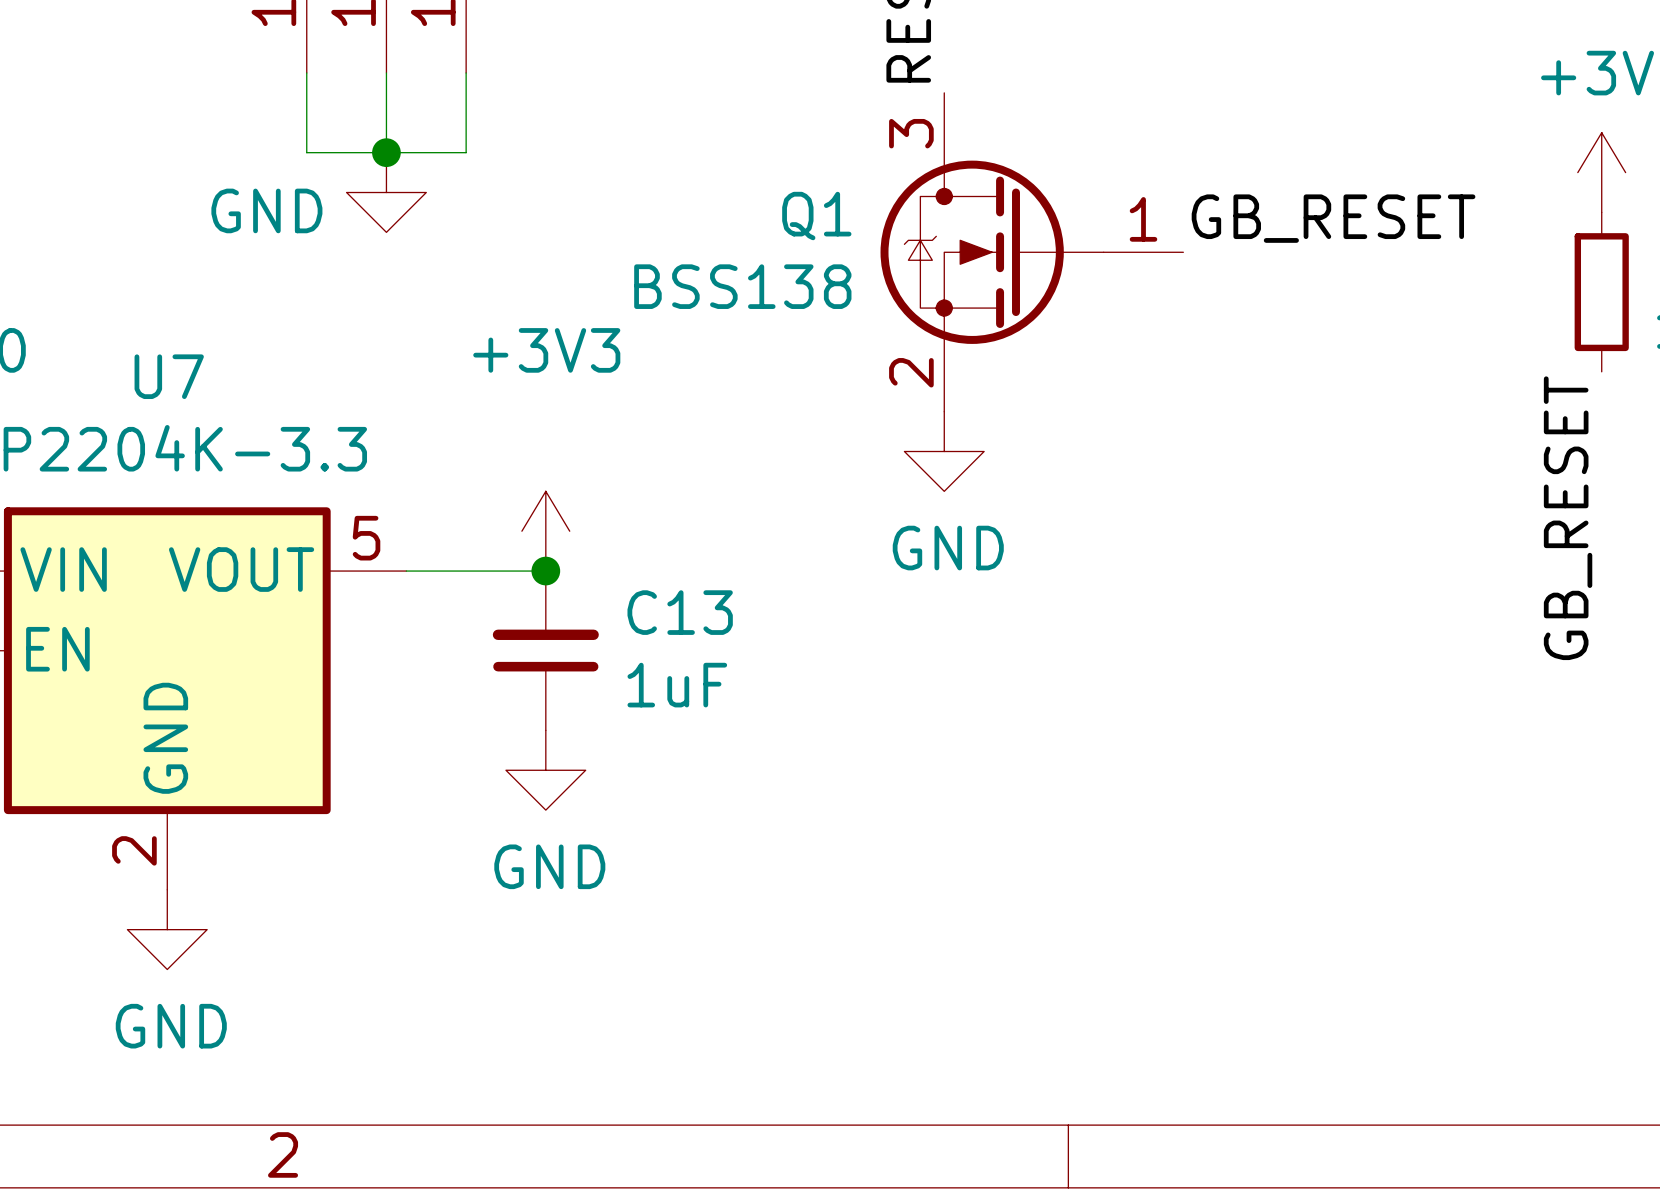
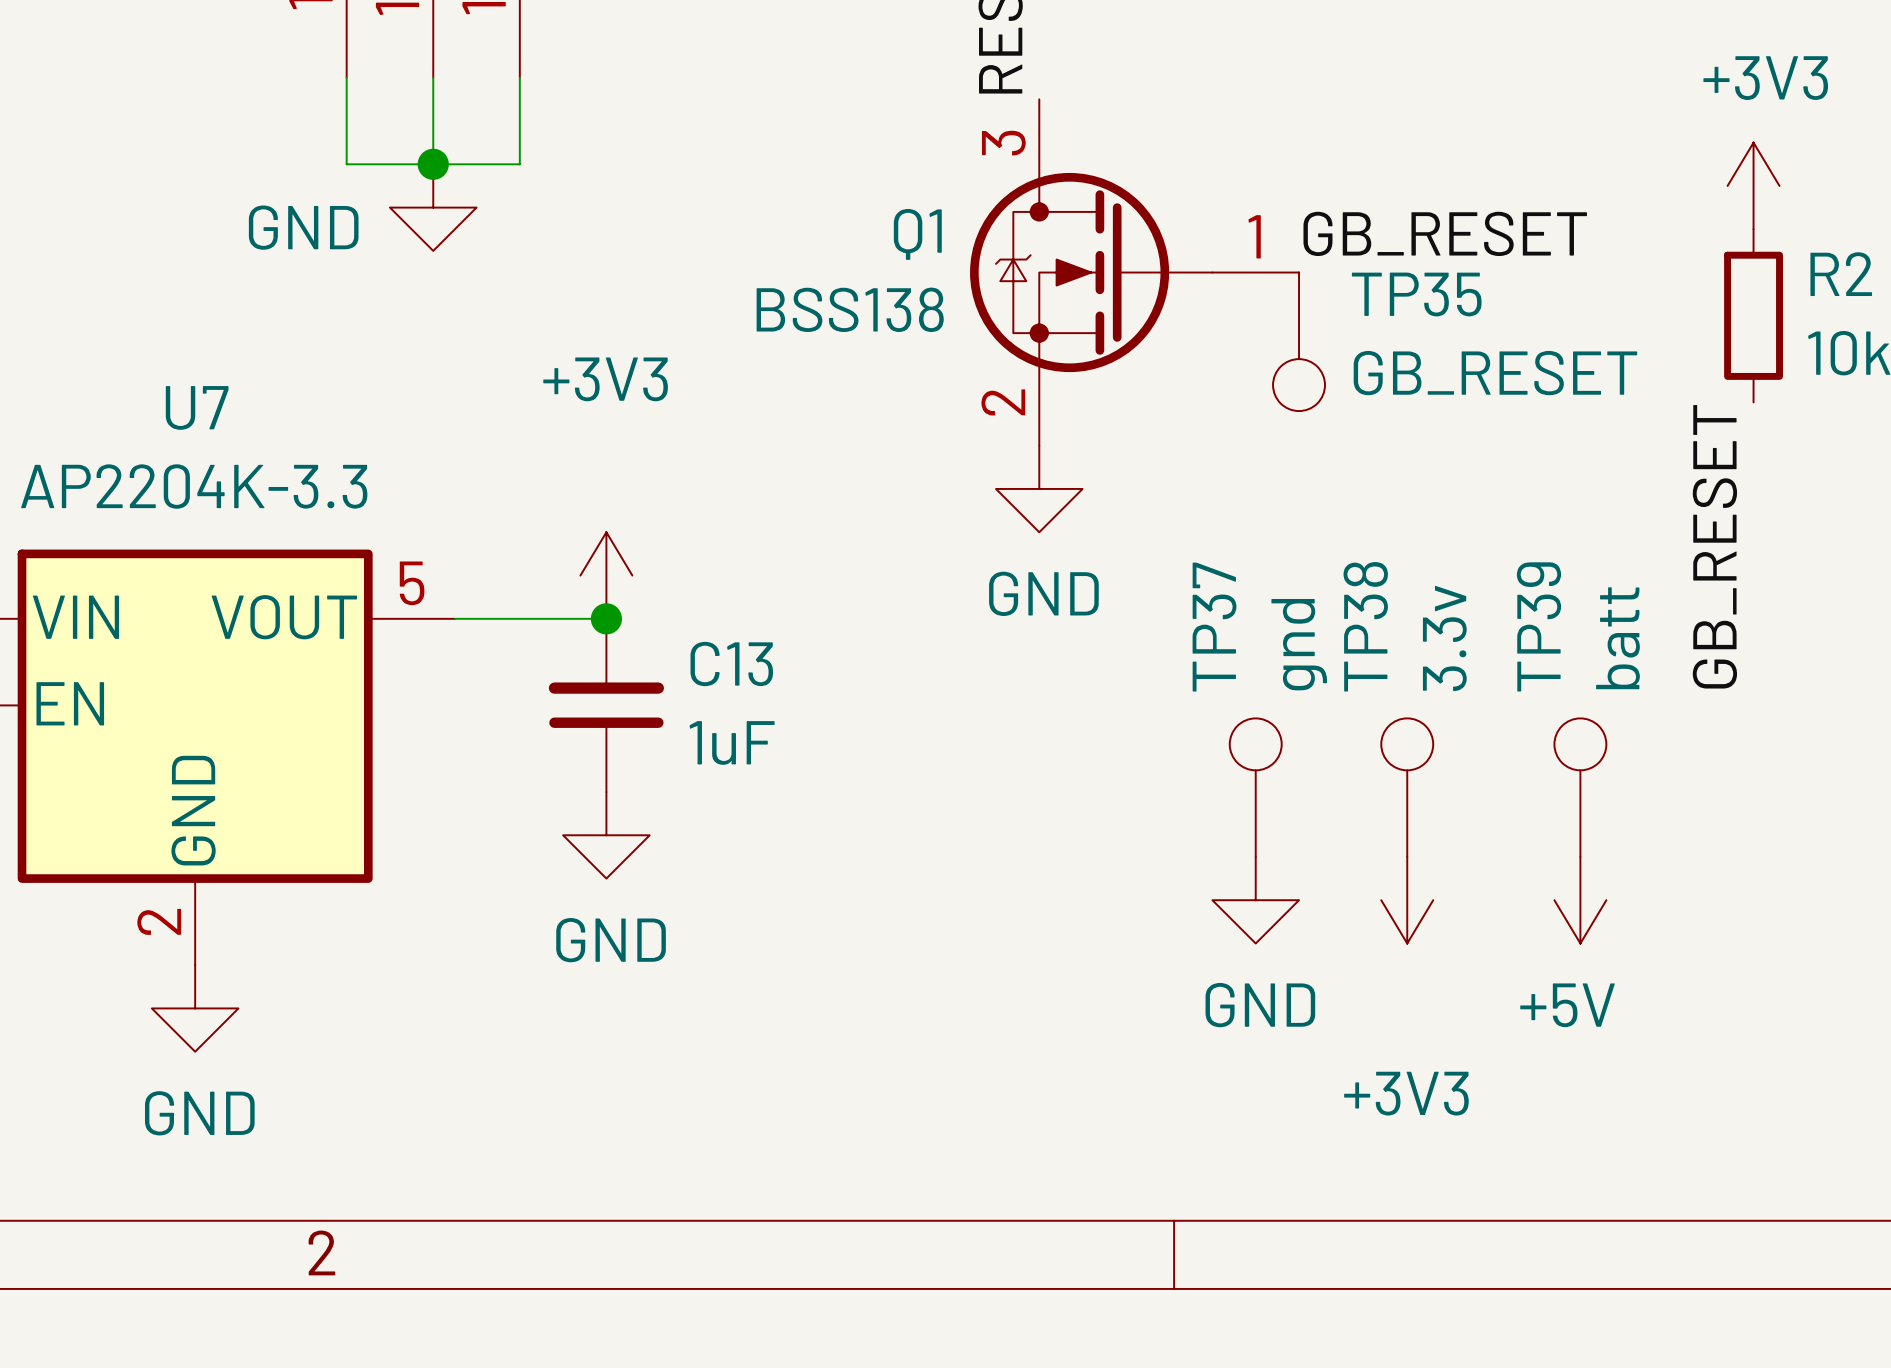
TP35: none -> GB_RESET (1299, 341)
TP37: none -> gnd (1255, 787)
TP38: none -> 3.3v (1407, 787)
TP39: none -> batt (1580, 787)
power symbol: none -> GND (1255, 900)
power symbol: none -> +3V3 (1407, 900)
power symbol: none -> +5V (1580, 900)

